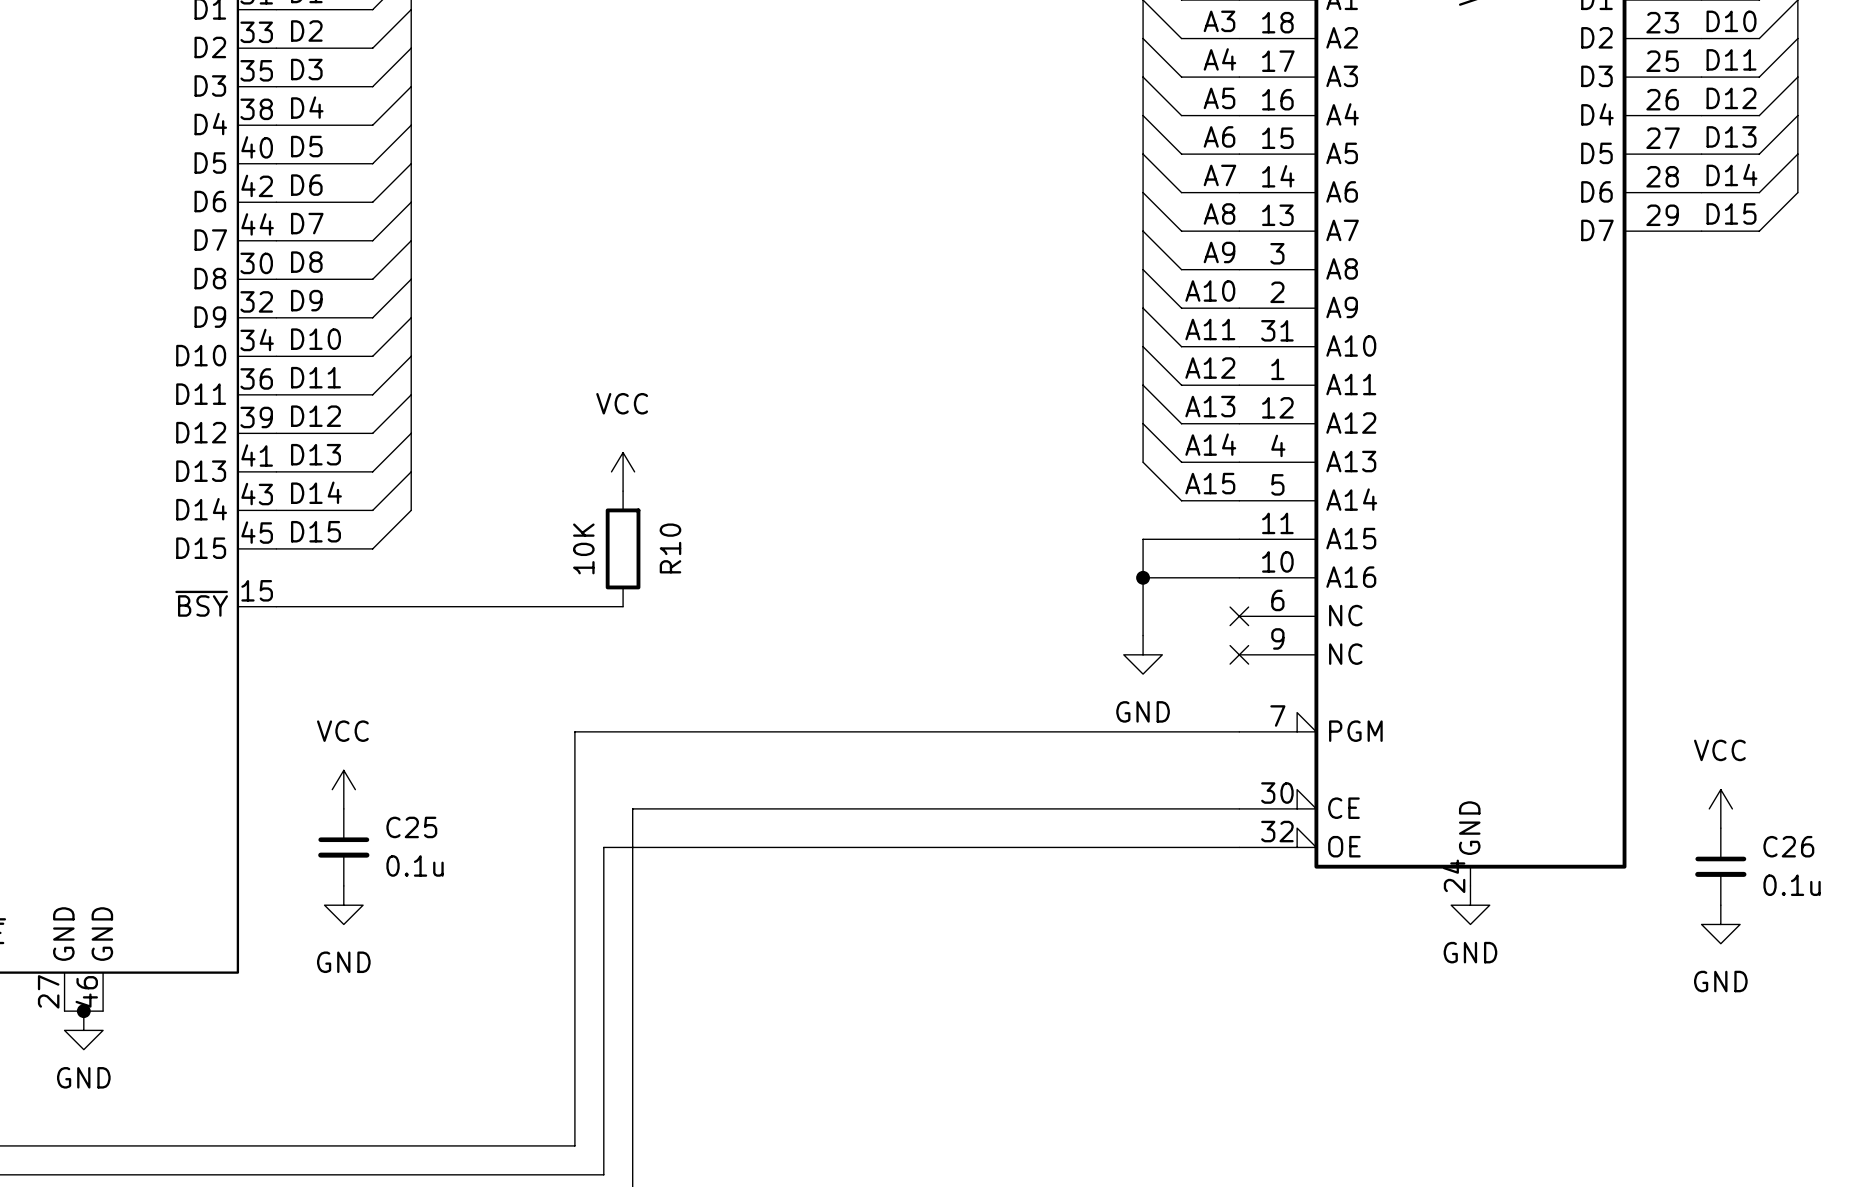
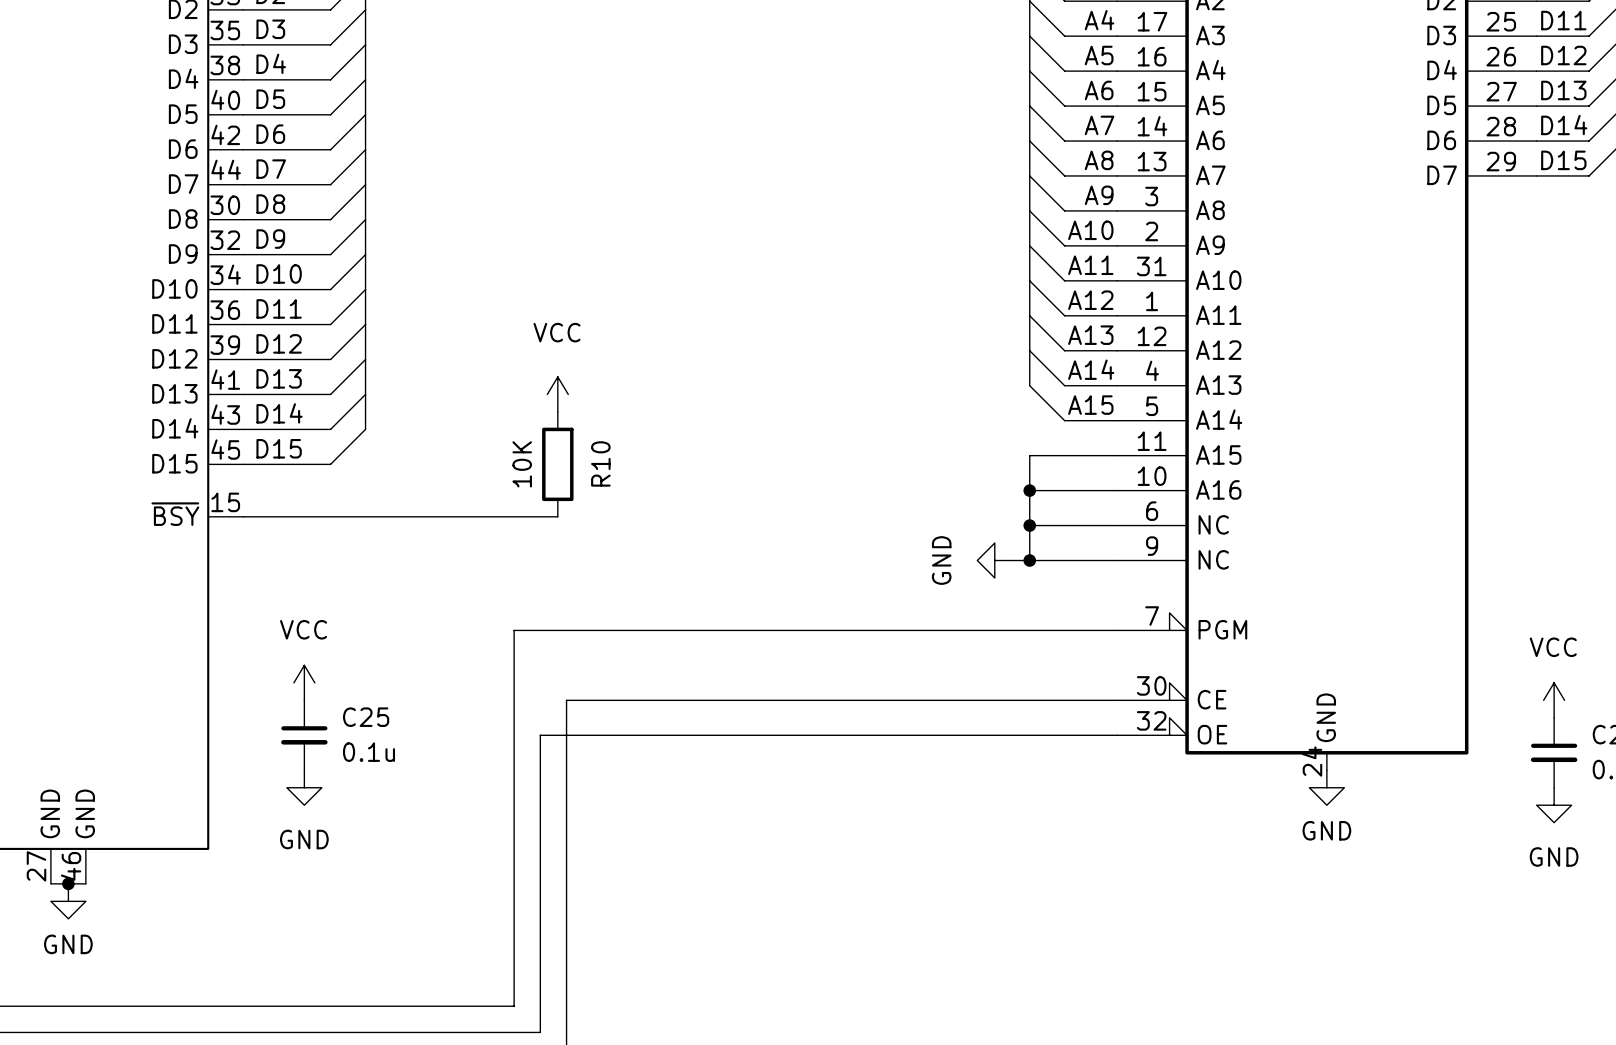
wire: none -> (1029, 525) (1117, 525)
junction: none -> (1029, 525)
no-connect mark: (1239, 616) -> none
wire: none -> (1012, 560) (1117, 560)
power symbol rotation: 0° (1143, 654) -> 90° clockwise (994, 560)
power symbol position: GND (1143, 654) -> GND (994, 560)
junction: none -> (1029, 560)
no-connect mark: (1239, 654) -> none

